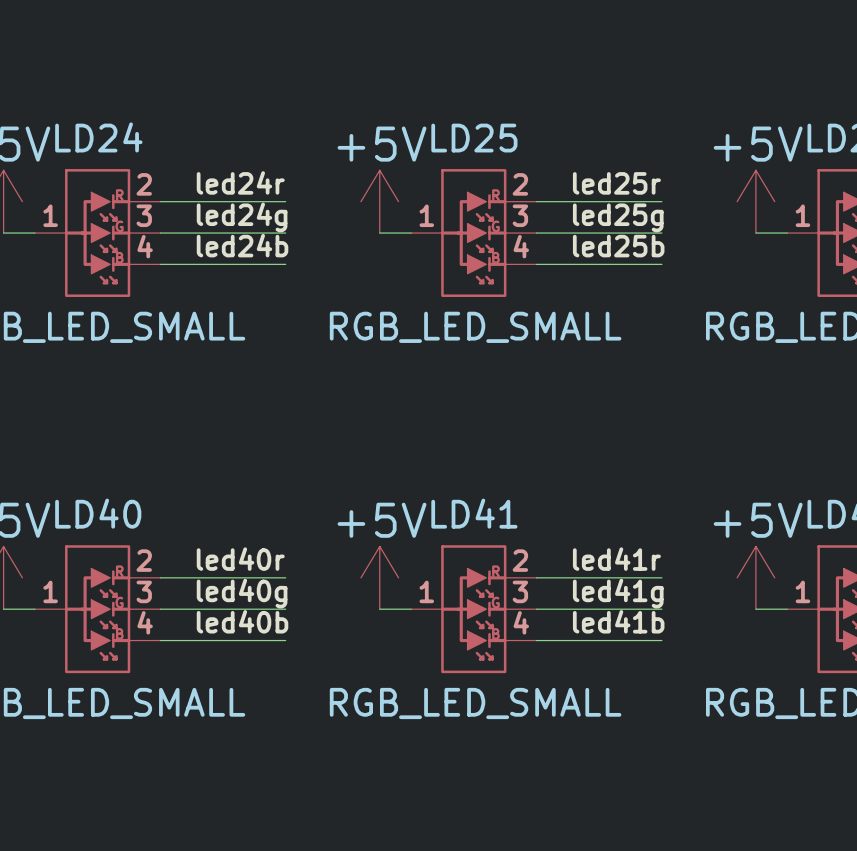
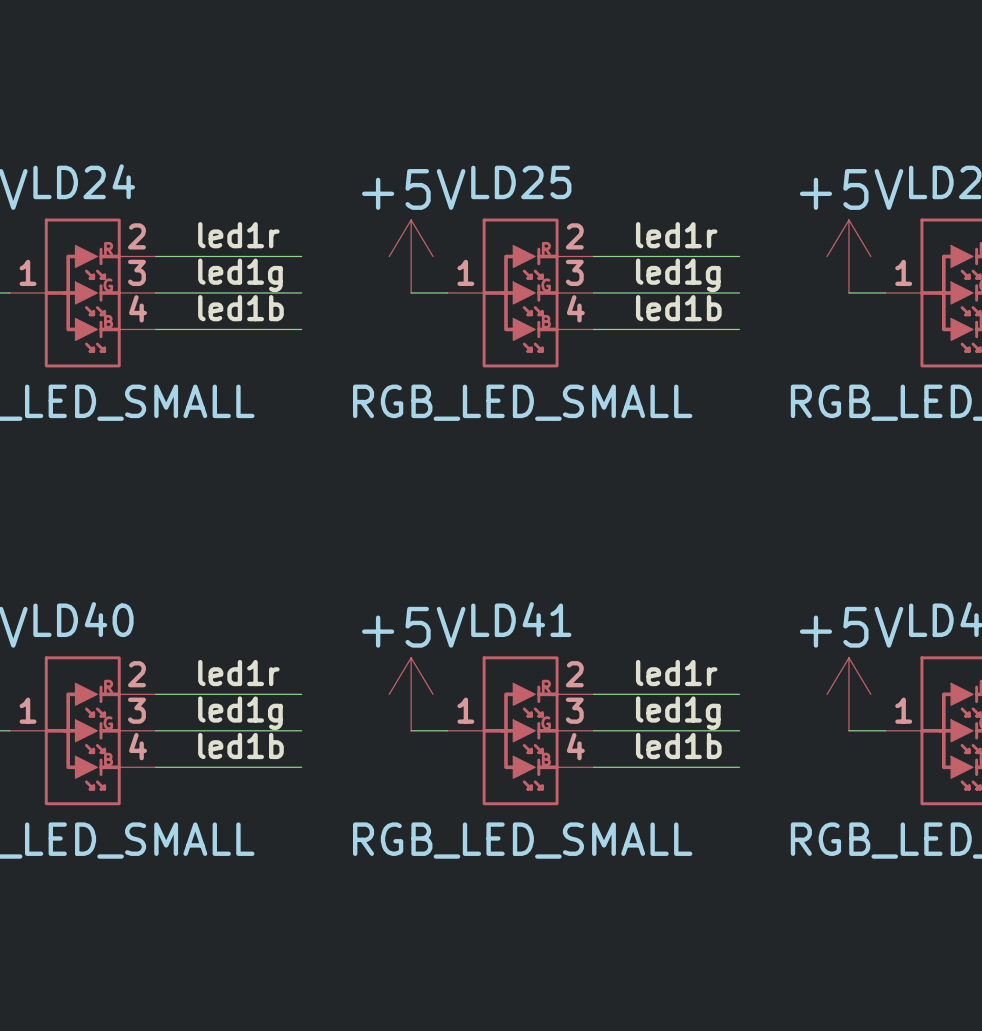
label: led24r (240, 182) -> led1r (238, 235)
label: led25r (616, 183) -> led1r (676, 235)
label: led24g (242, 217) -> led1g (240, 275)
label: led25g (618, 217) -> led1g (678, 275)
label: led24b (242, 245) -> led1b (240, 308)
label: led25b (618, 246) -> led1b (678, 308)
label: led40r (240, 559) -> led1r (238, 673)
label: led41r (616, 559) -> led1r (676, 673)
label: led40g (242, 593) -> led1g (240, 713)
label: led41g (618, 593) -> led1g (678, 713)
label: led40b (242, 621) -> led1b (240, 746)
label: led41b (618, 621) -> led1b (678, 746)

